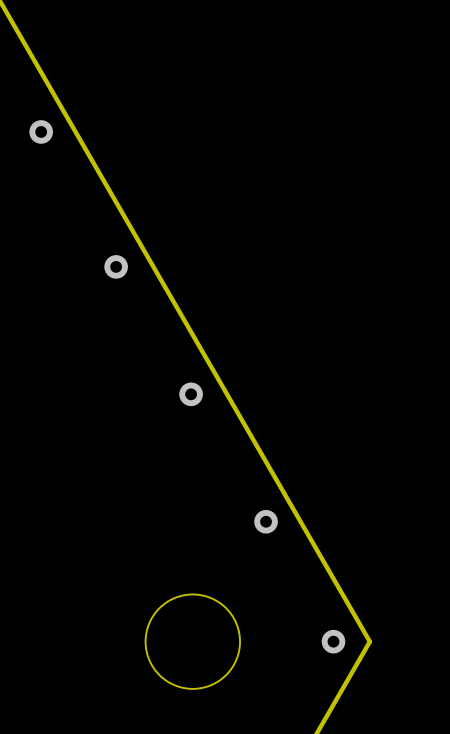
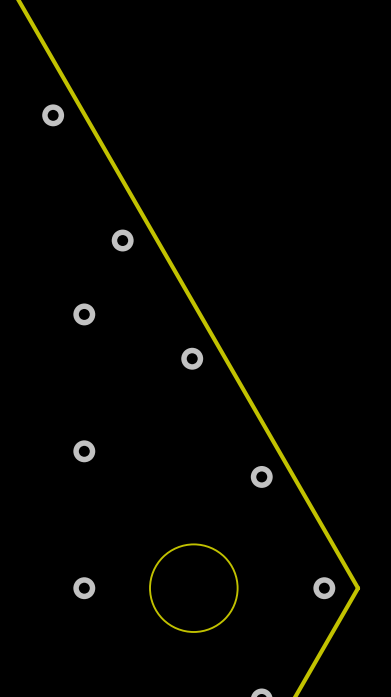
via: none -> (84, 314)
via: none -> (84, 451)
via: none -> (84, 588)

